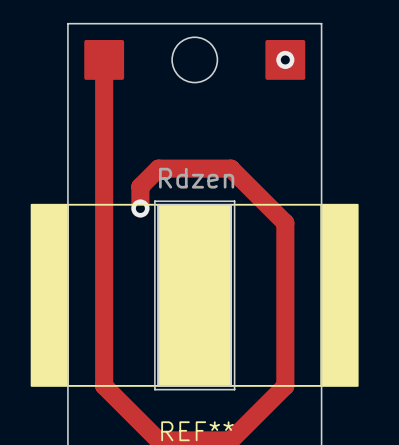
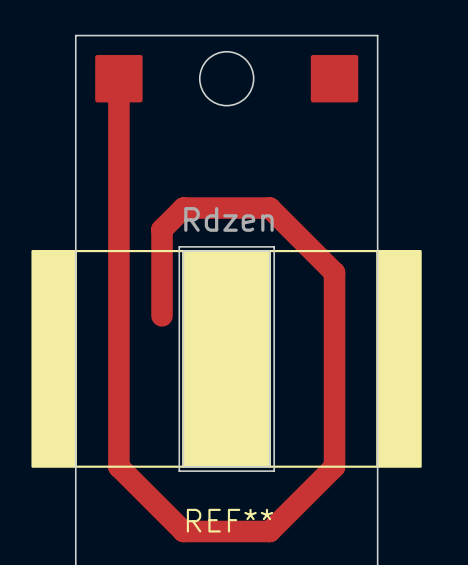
via: (285, 59) -> none
track: none -> (162, 255) (162, 315)
via: (140, 208) -> none

